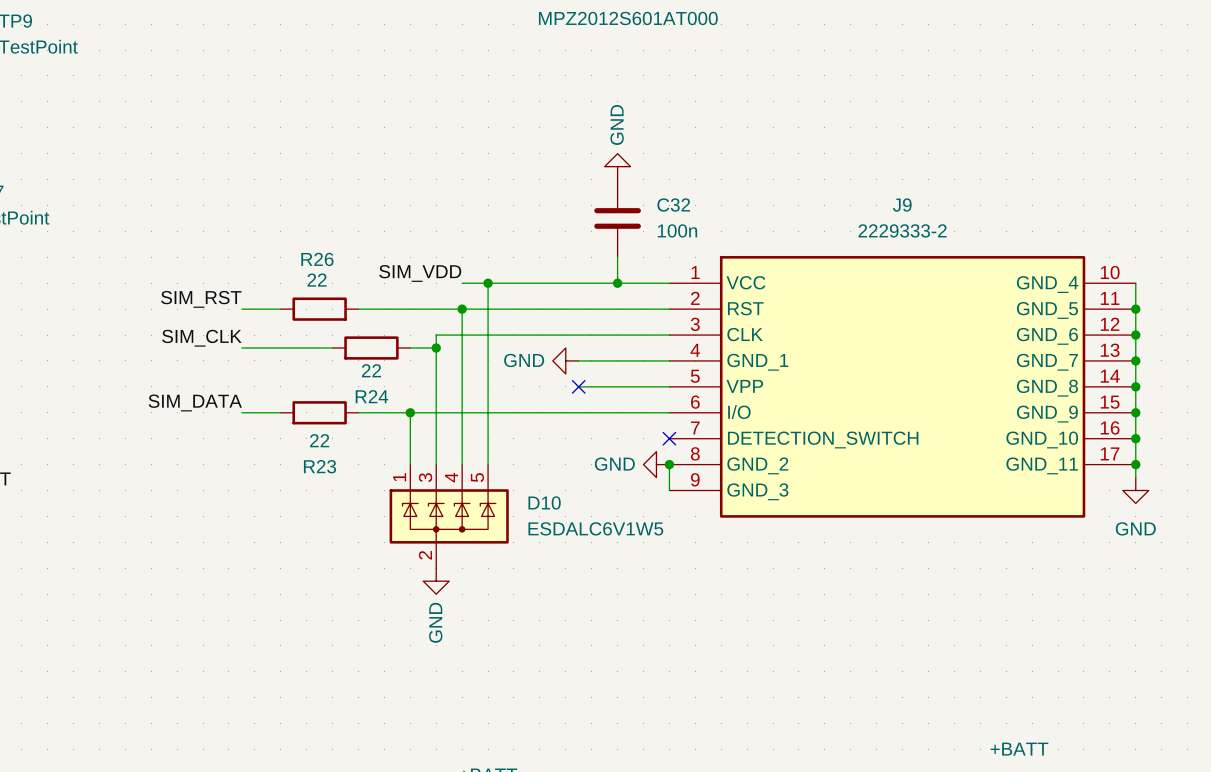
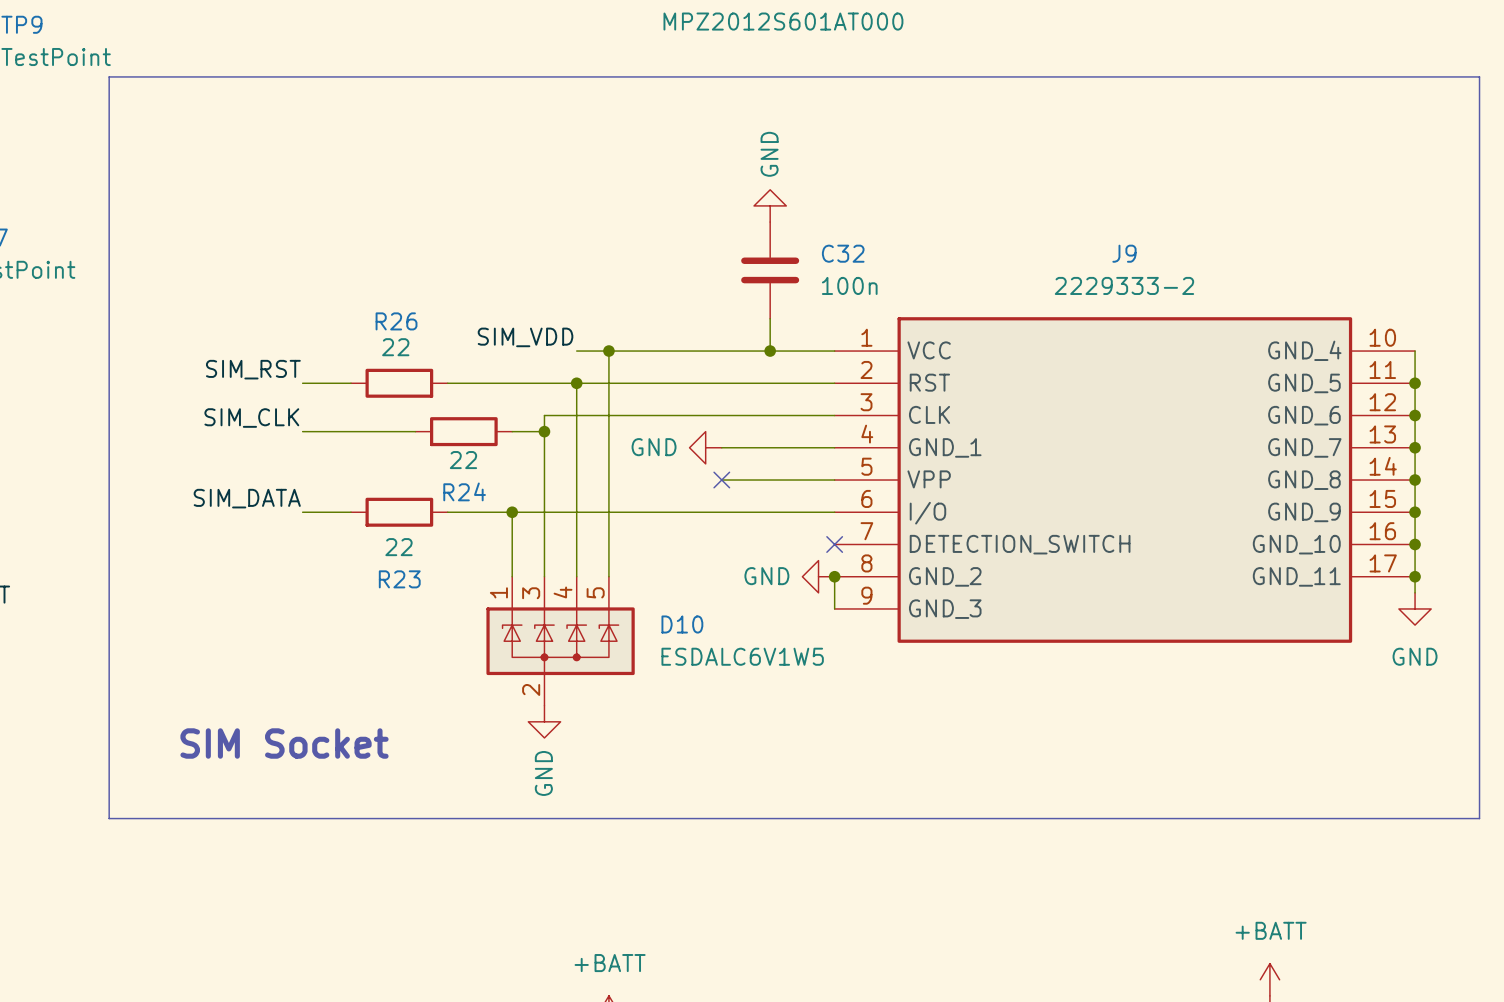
line: none -> (109, 76) (1479, 76) (1479, 818) (109, 818) (109, 76)
text: none -> SIM Socket (284, 743)

